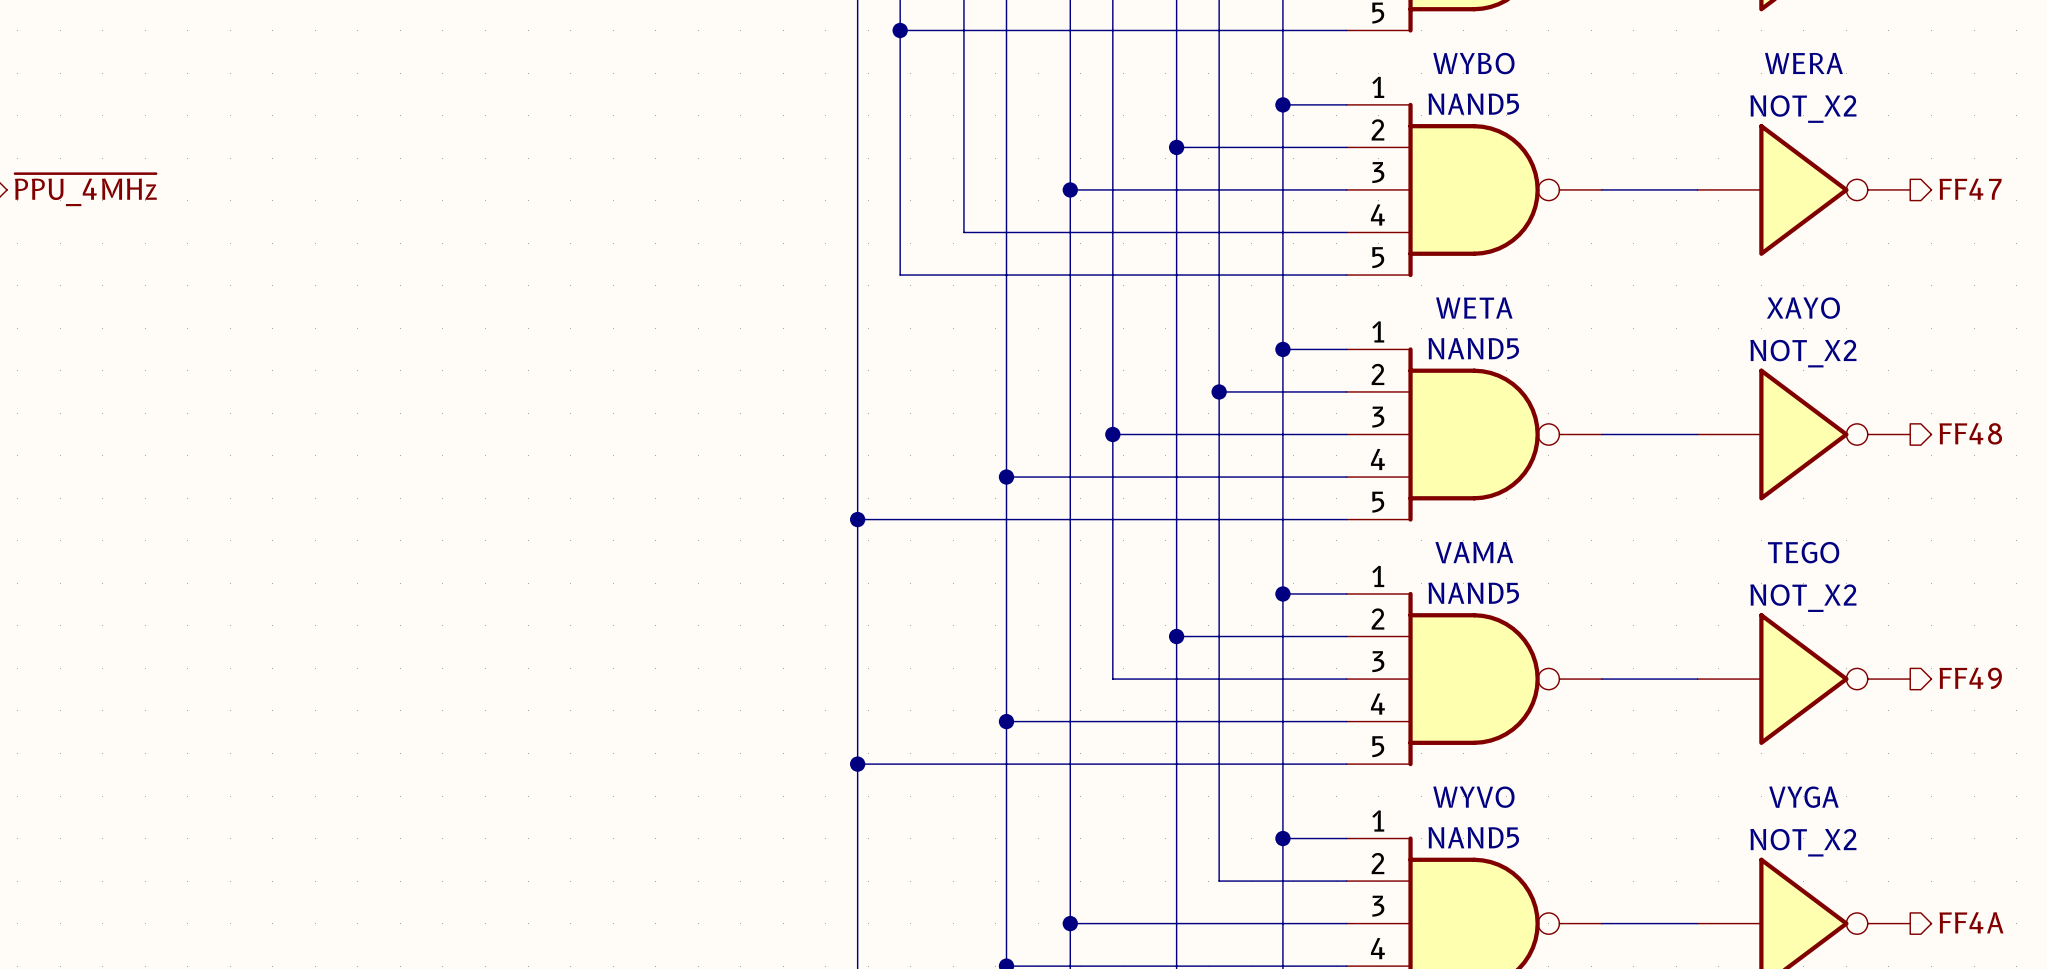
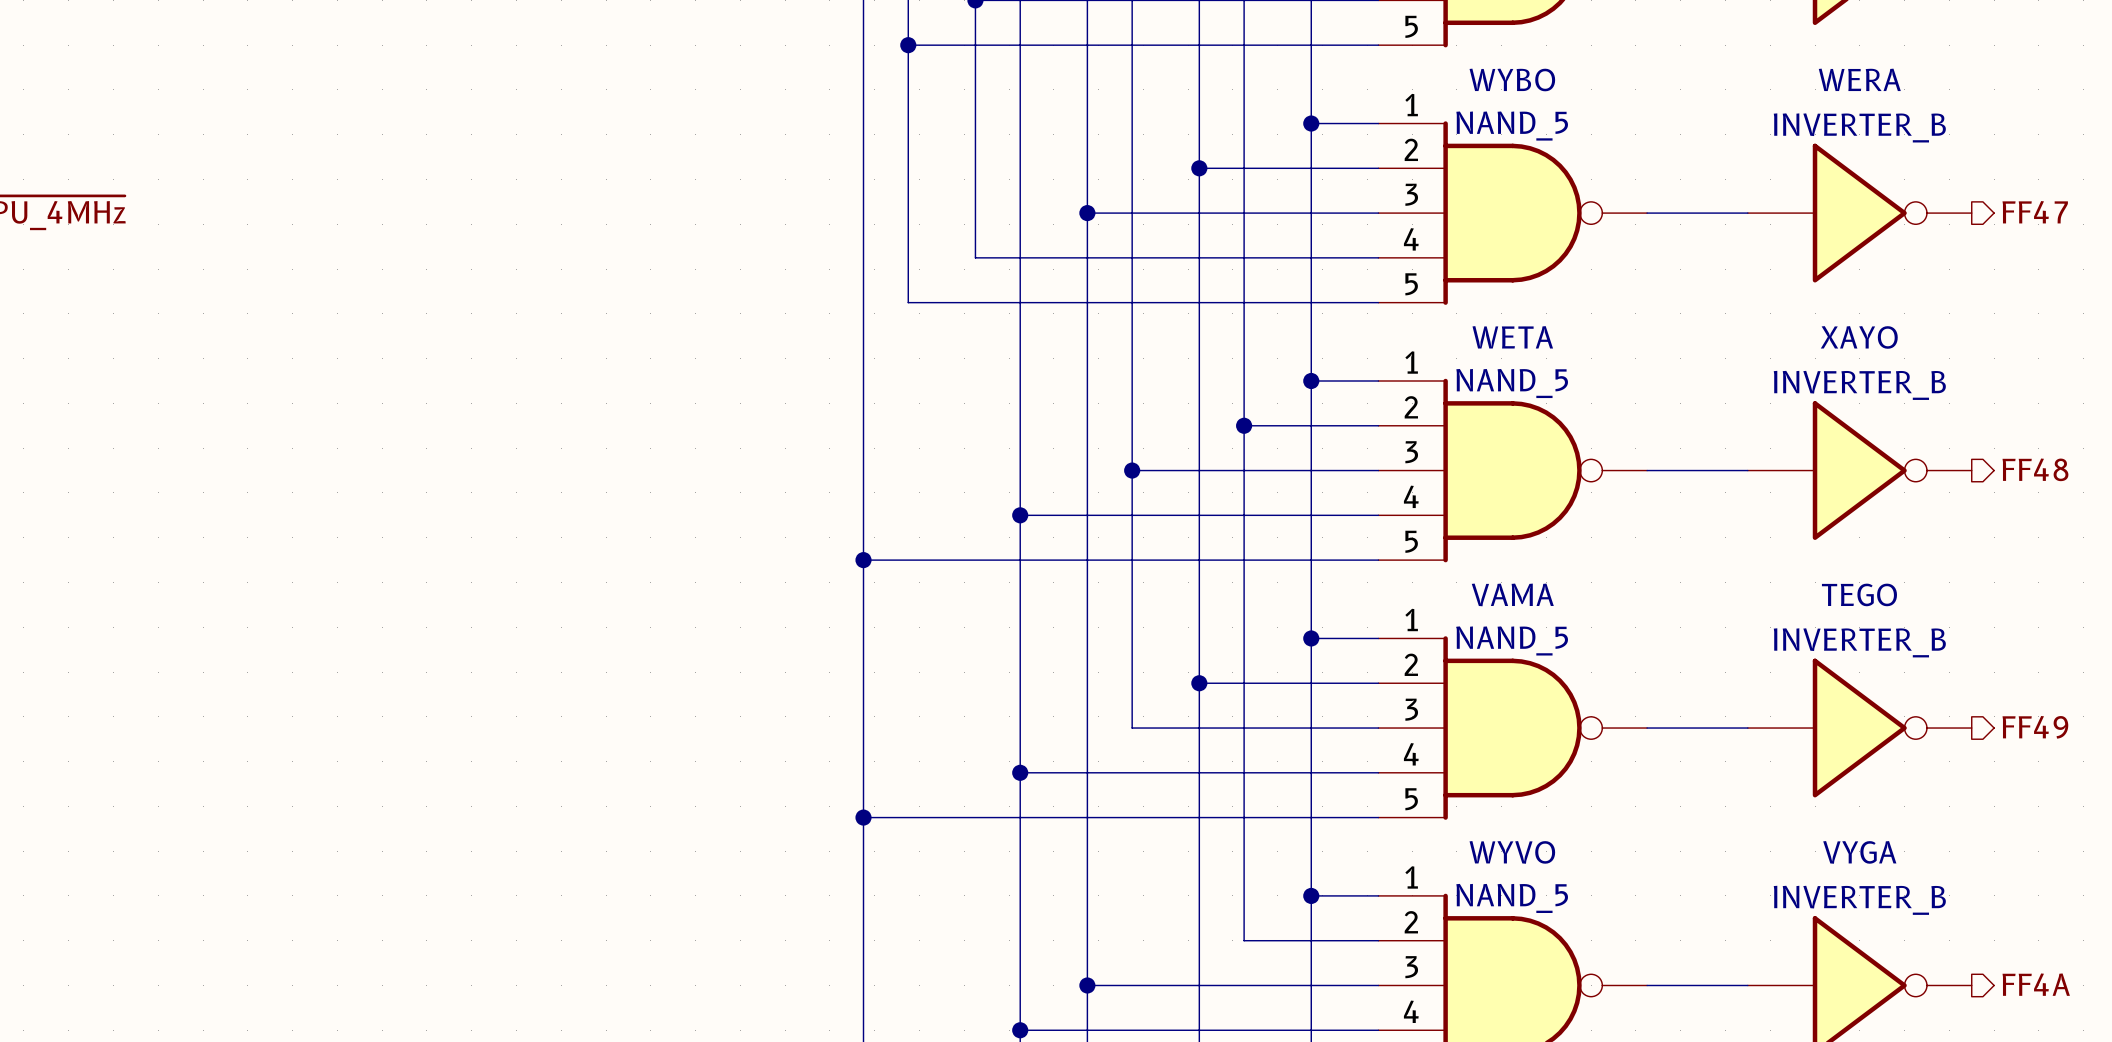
WYBO value: NAND5 (1473, 104) -> NAND_5 (1512, 126)
WERA value: NOT_X2 (1803, 109) -> INVERTER_B (1859, 127)
WETA value: NAND5 (1473, 348) -> NAND_5 (1512, 383)
XAYO value: NOT_X2 (1803, 353) -> INVERTER_B (1859, 385)
VAMA value: NAND5 (1473, 593) -> NAND_5 (1512, 640)
TEGO value: NOT_X2 (1803, 598) -> INVERTER_B (1859, 642)
WYVO value: NAND5 (1473, 837) -> NAND_5 (1512, 898)
VYGA value: NOT_X2 (1803, 842) -> INVERTER_B (1859, 900)

